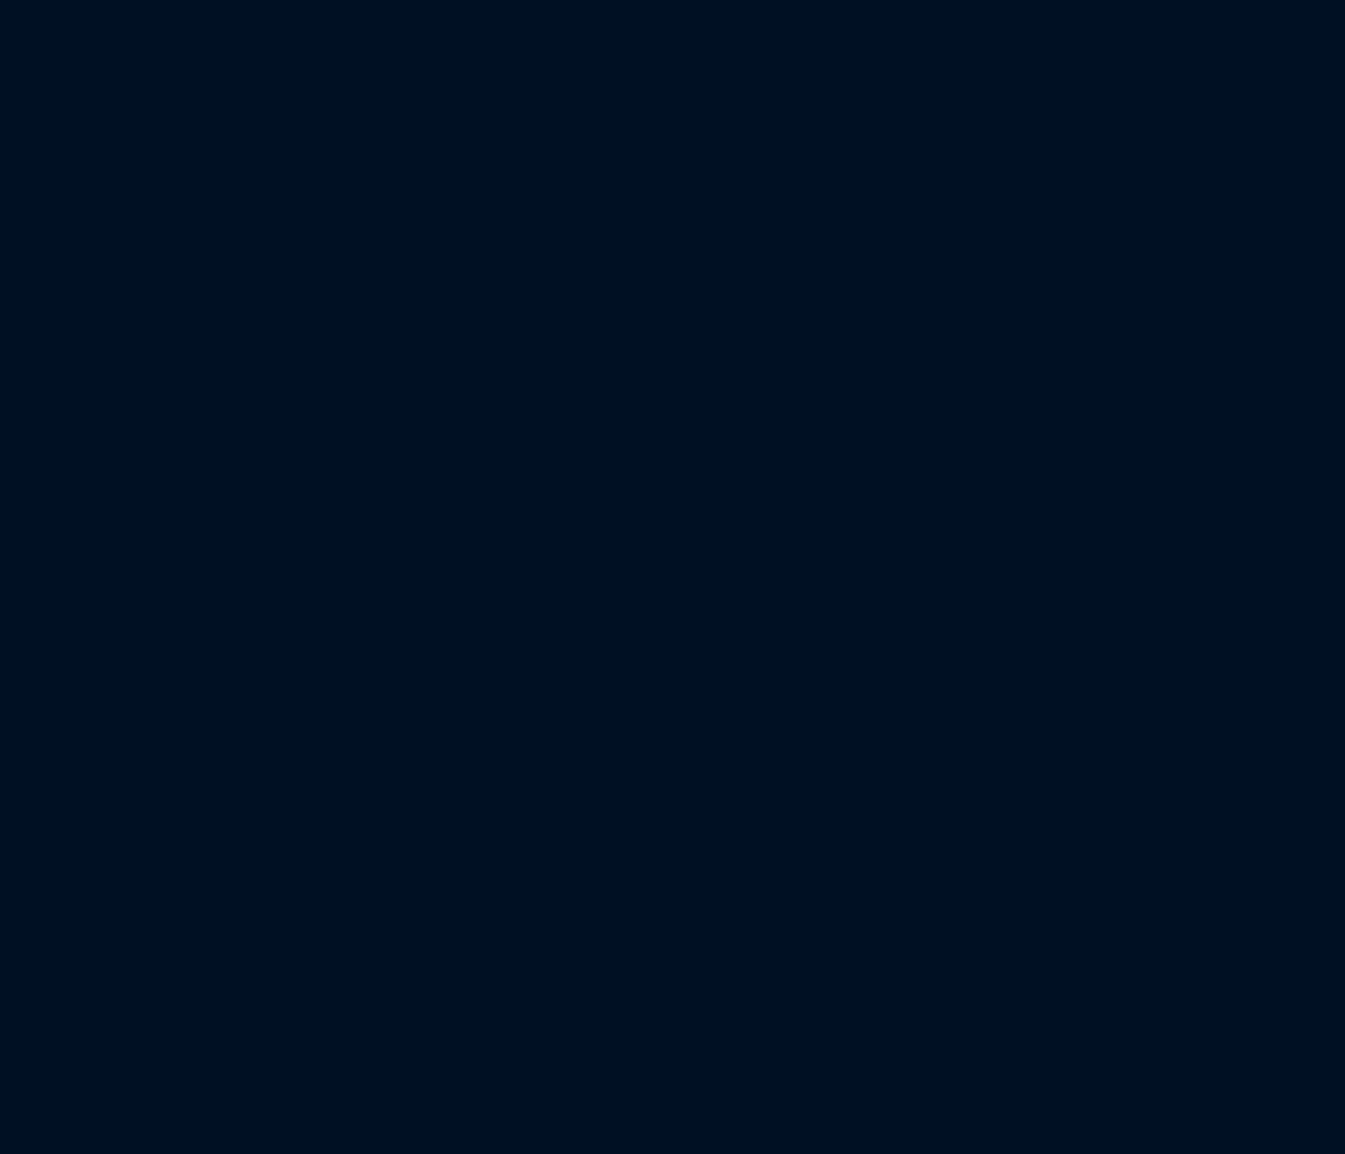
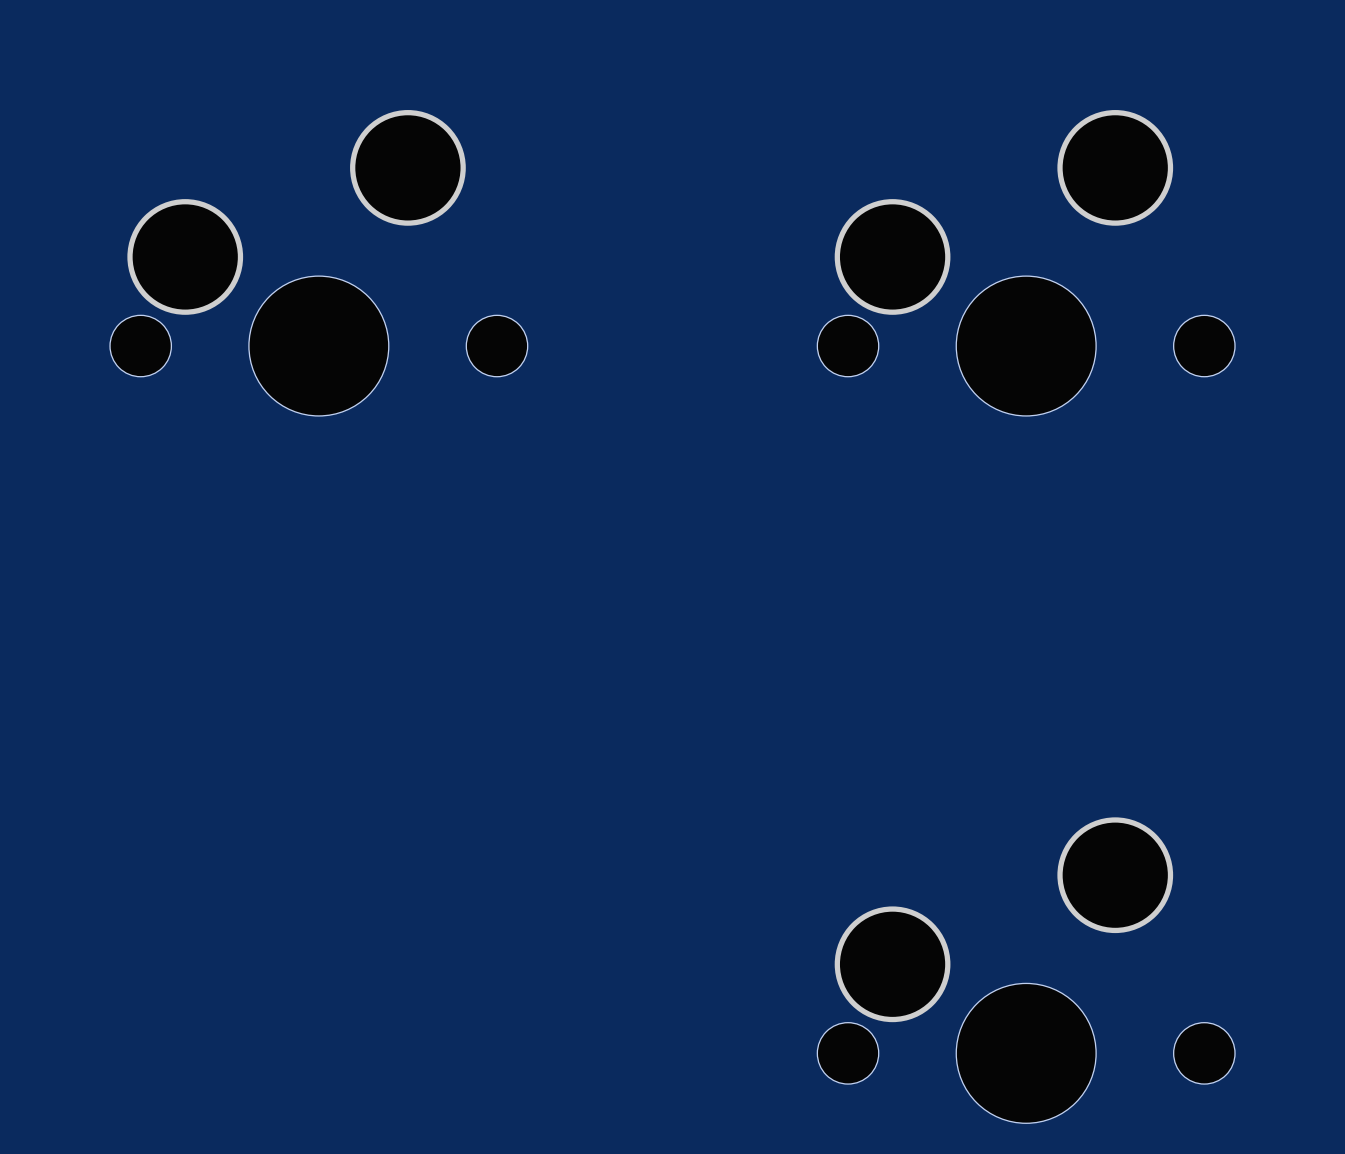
part: none -> (318, 262)
part: none -> (1026, 262)
part: none -> (1026, 970)

